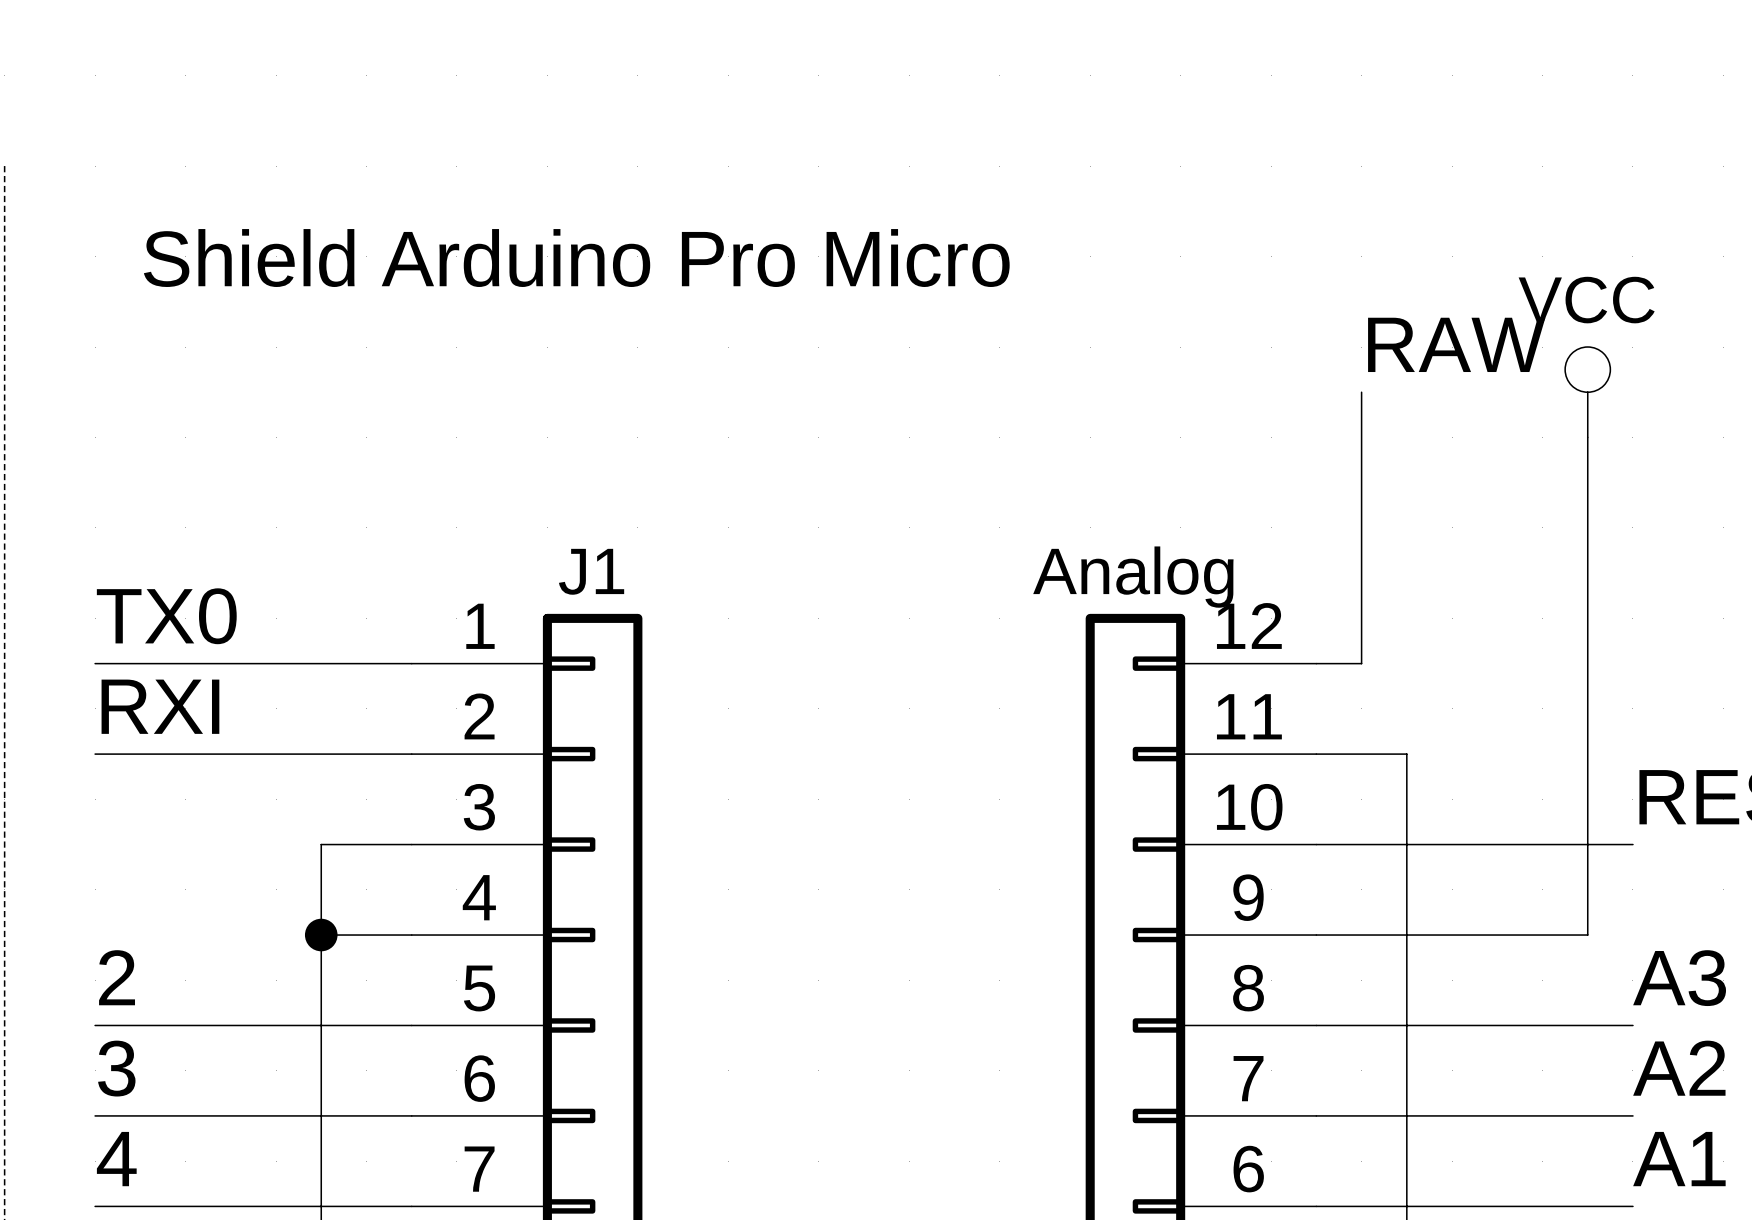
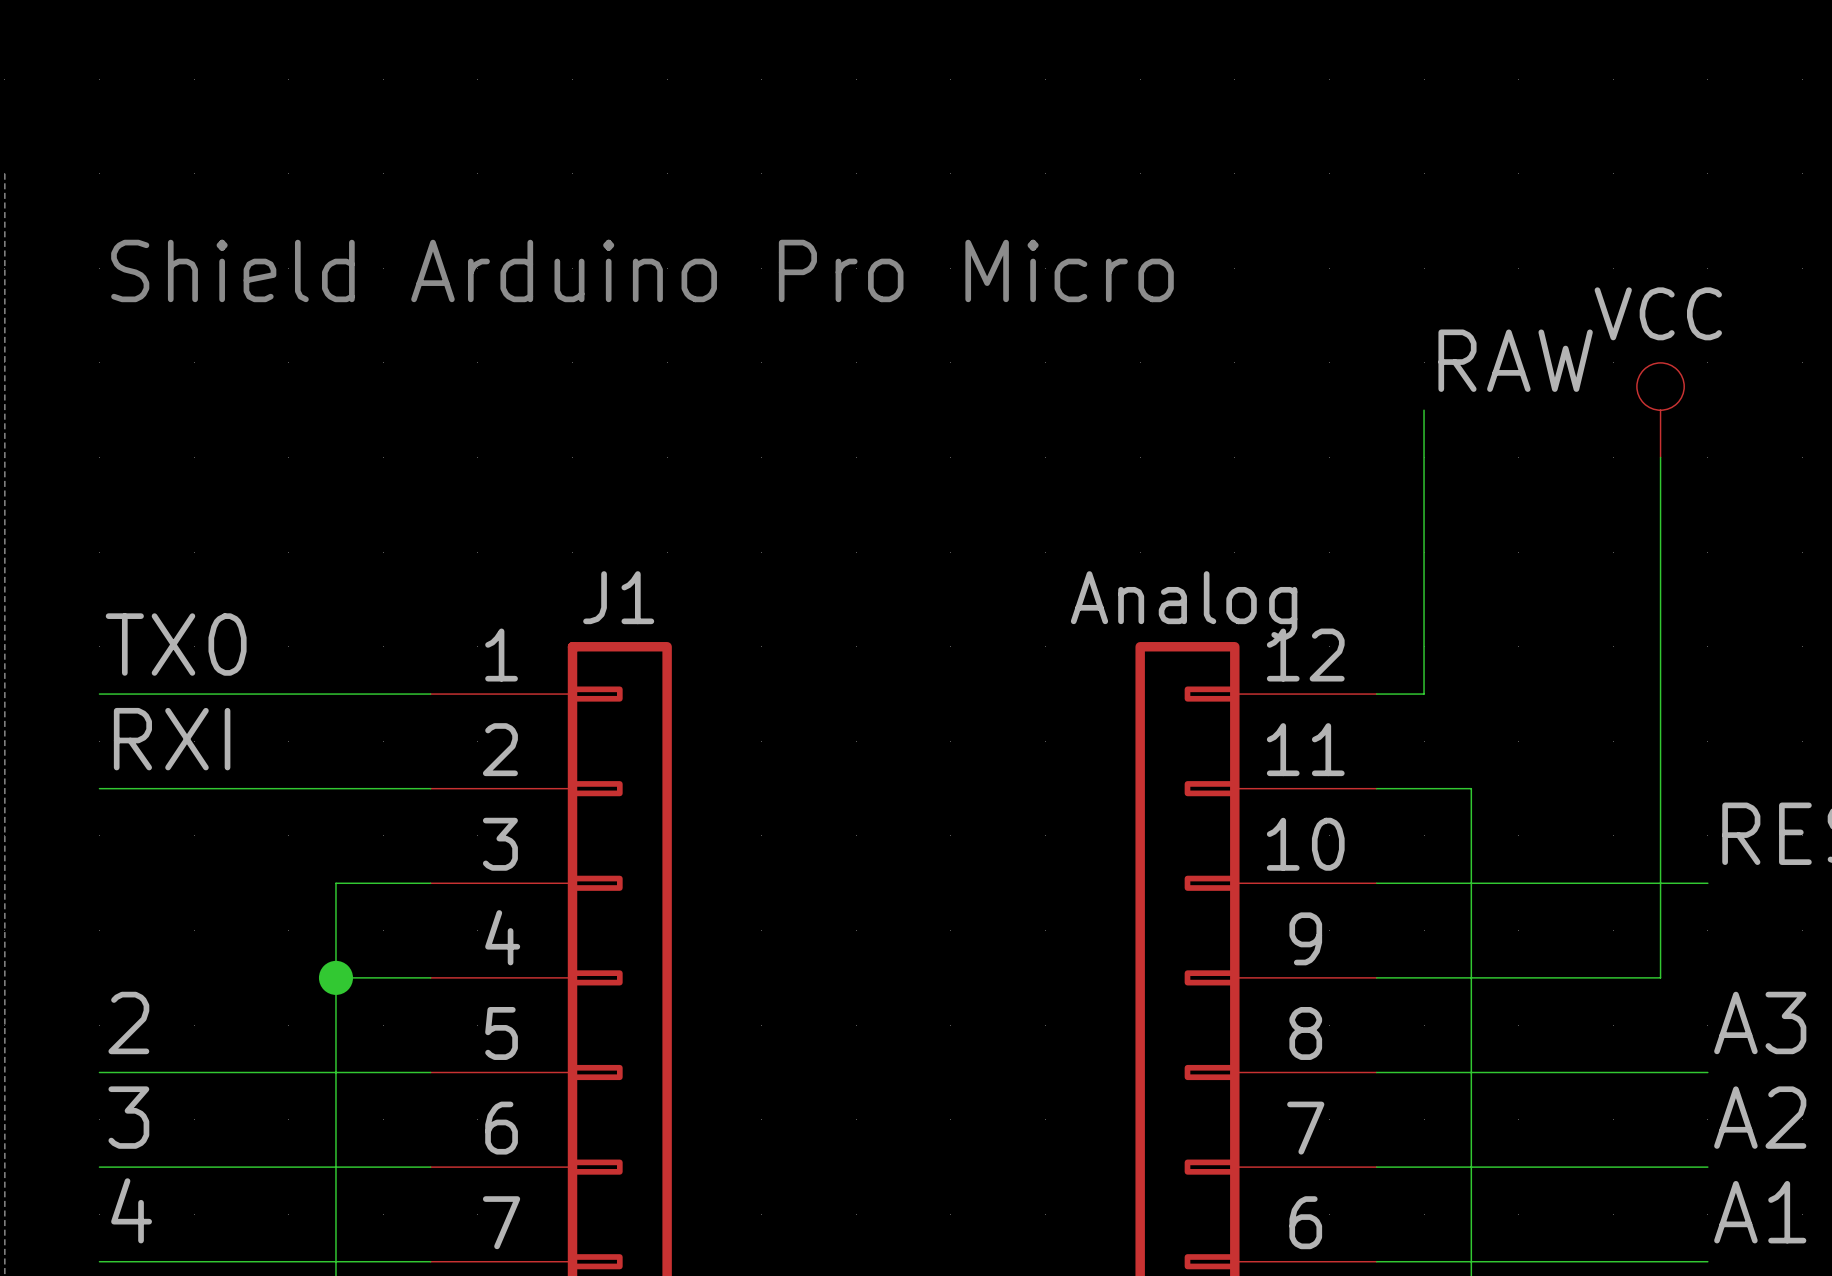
text position: Shield Arduino Pro Micro (576, 258) -> Shield Arduino Pro Micro (642, 270)

